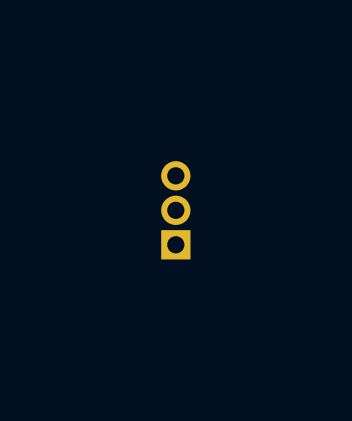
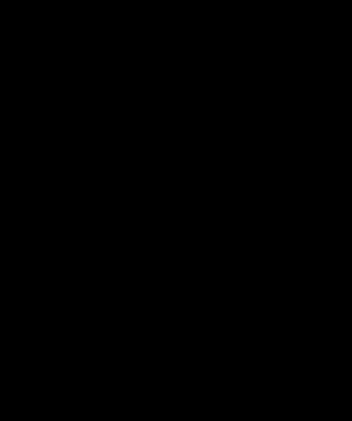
part: (175, 210) -> none

